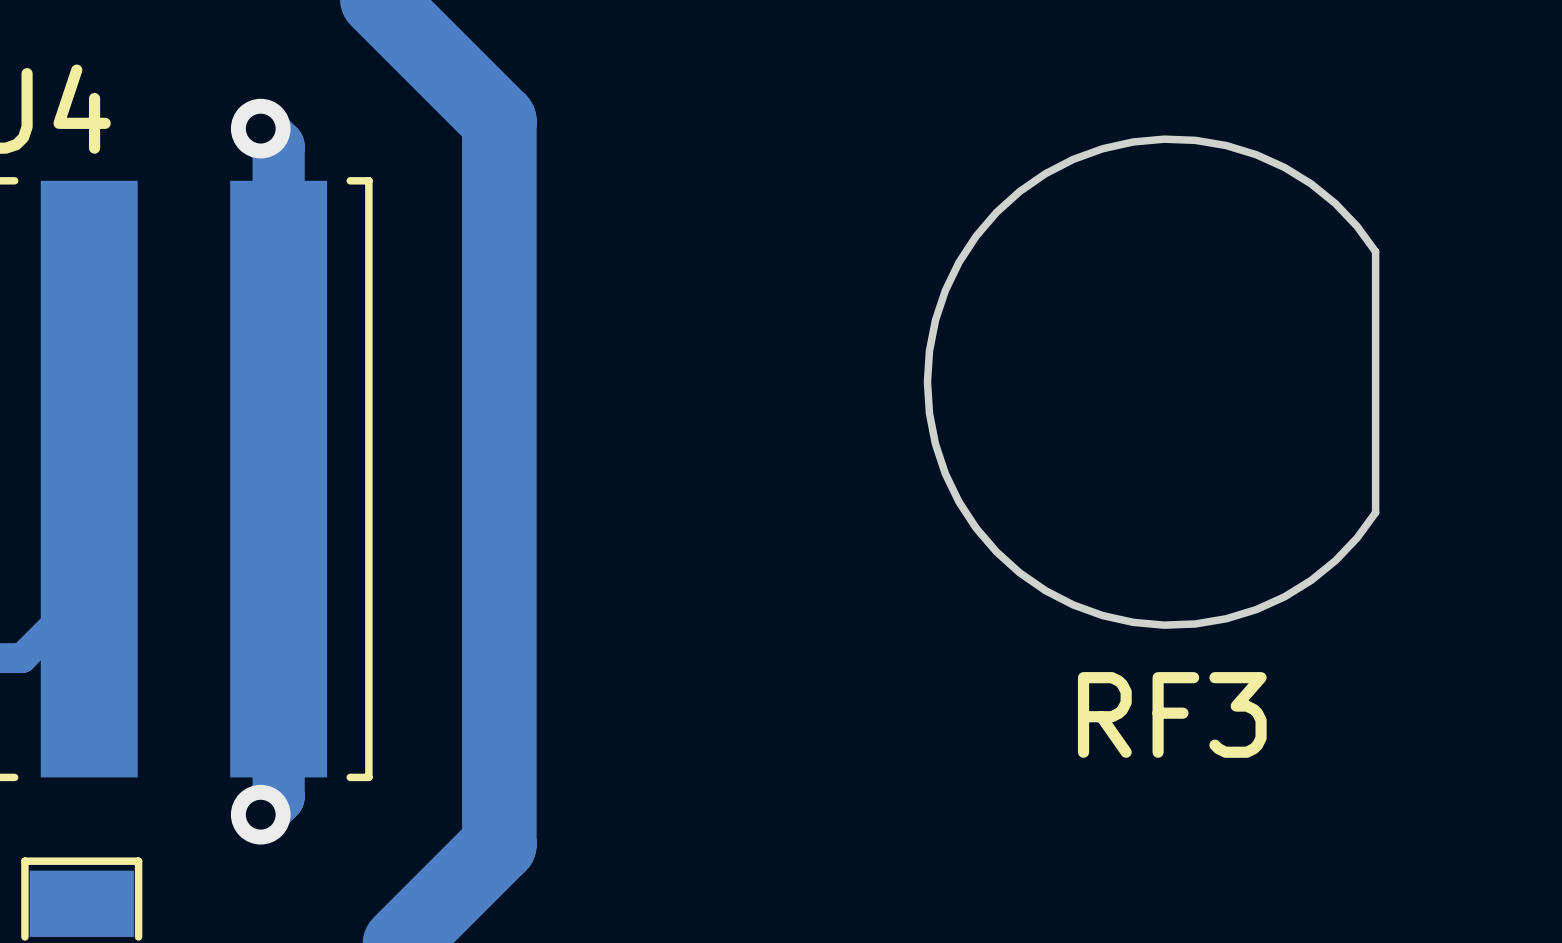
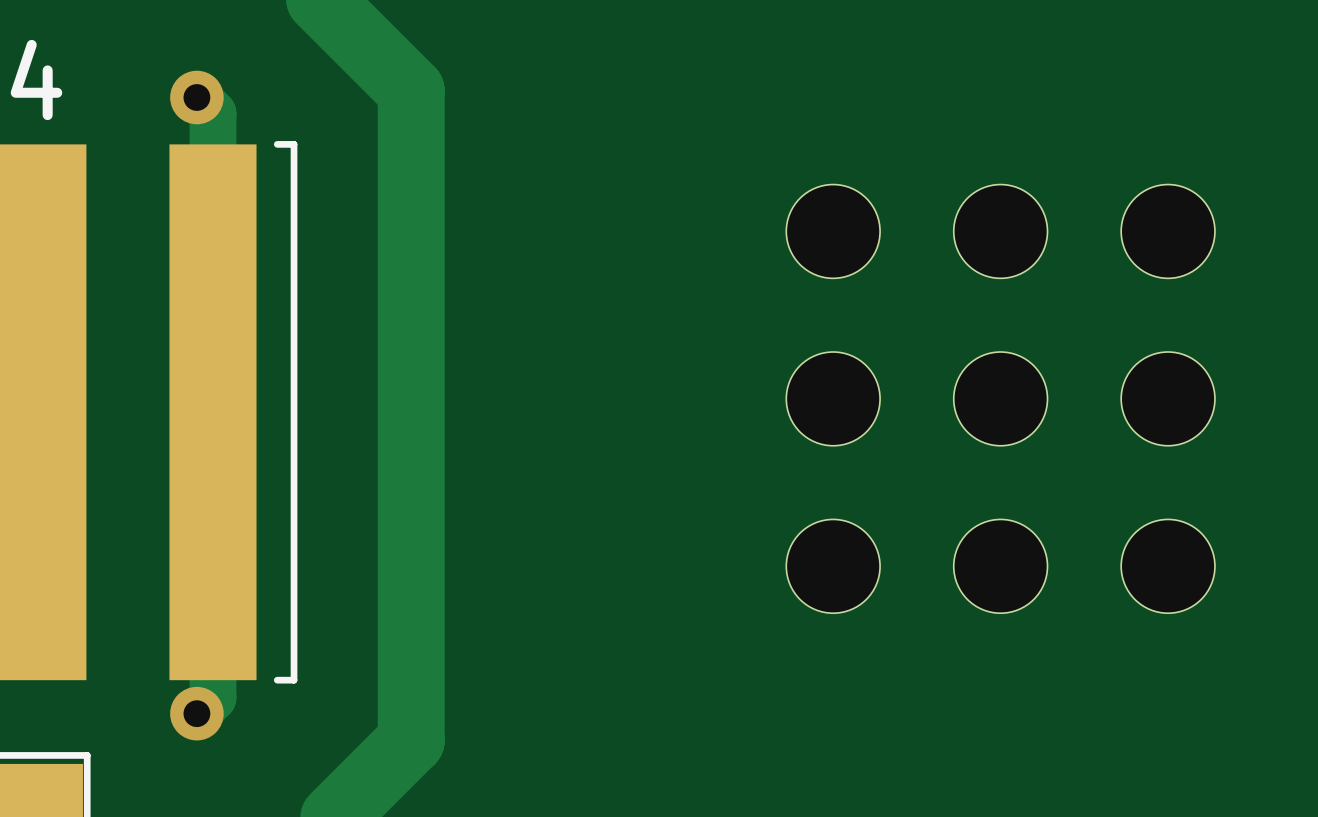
RF3: (1151, 382) -> none
part: none -> (1000, 398)

